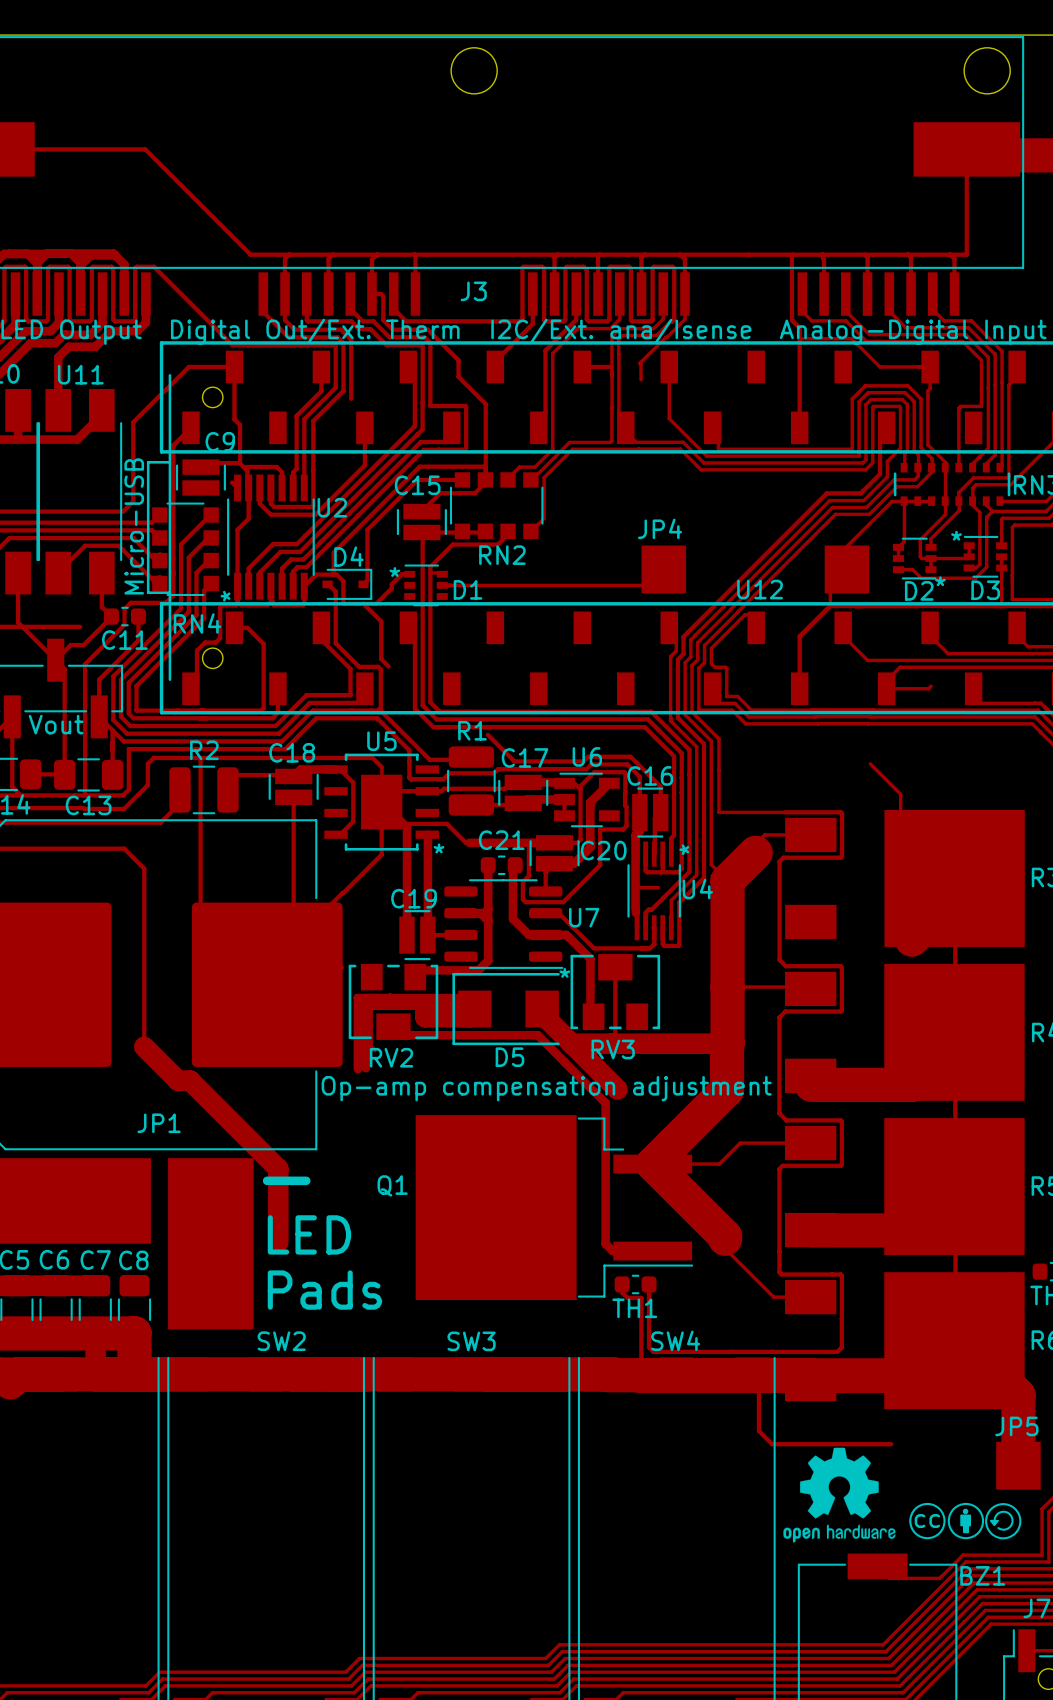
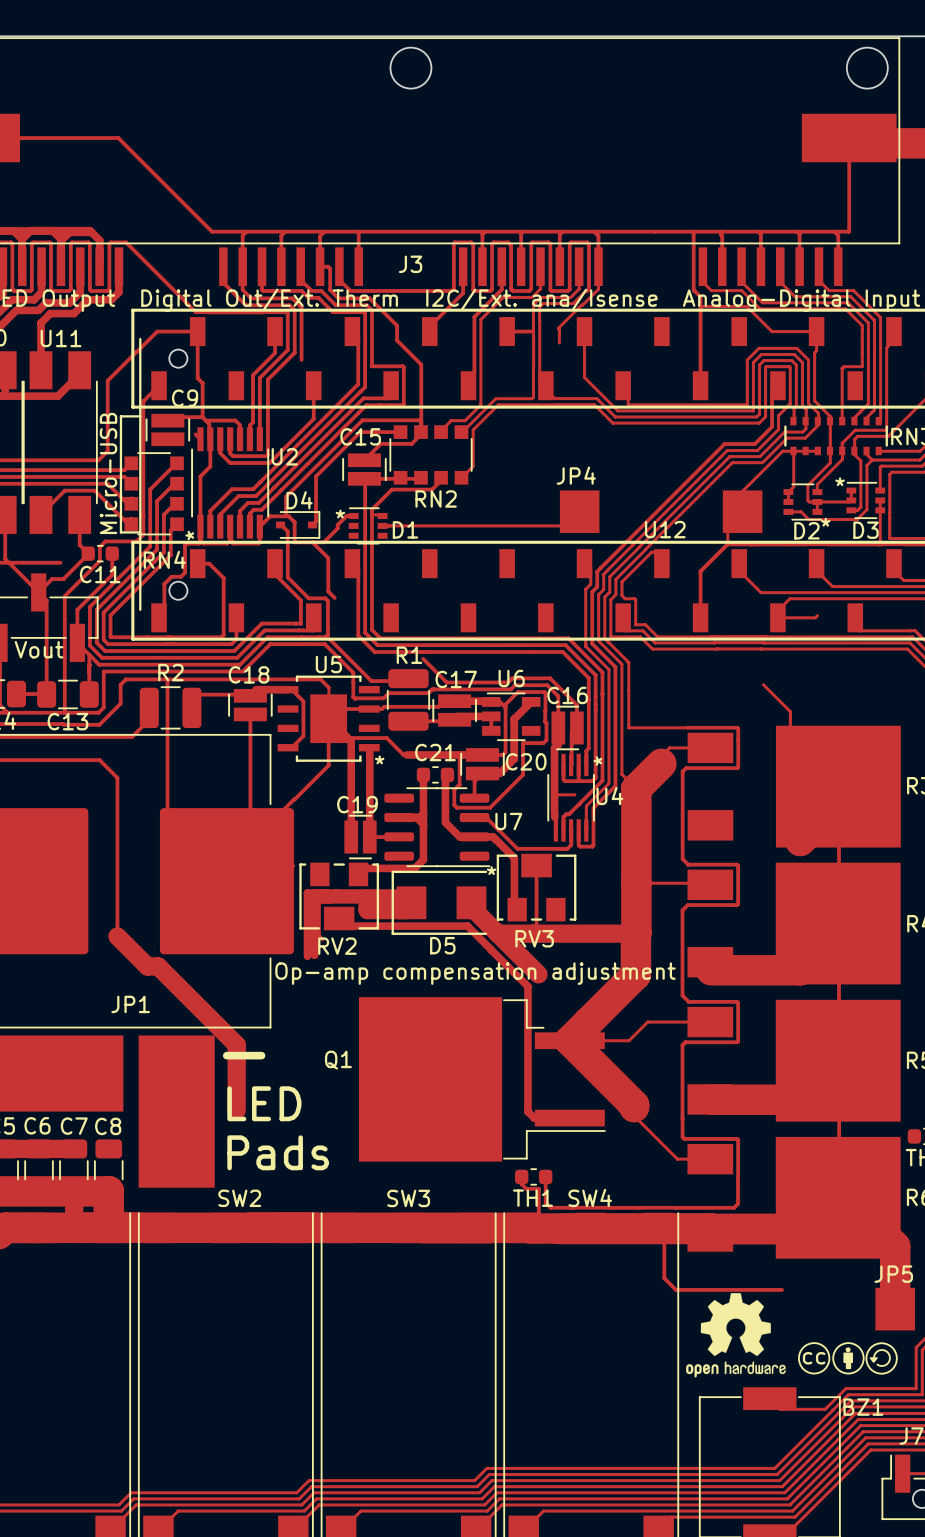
track: (622, 1284) (622, 1292) (627, 1297) (641, 1297) -> (521, 1176) (521, 1184) (526, 1188) (538, 1188)
TH1 position: (635, 1284) -> (533, 1176)
track: (649, 1284) (649, 1347) (653, 1351) -> none
track: (641, 1298) (641, 1365) -> none
track: none -> (545, 1176) (545, 1202) (550, 1207) (572, 1207)
track: none -> (538, 1189) (538, 1212) (523, 1227) (521, 1225)

